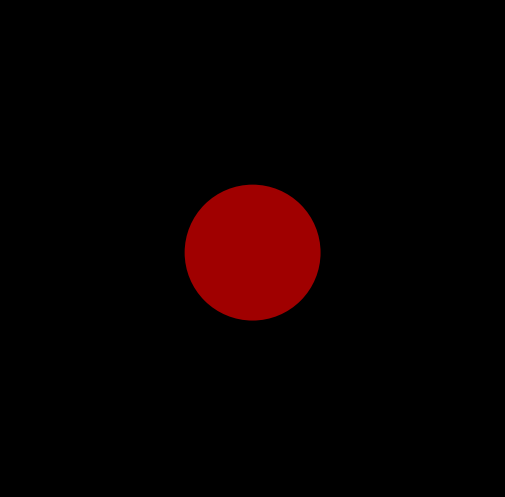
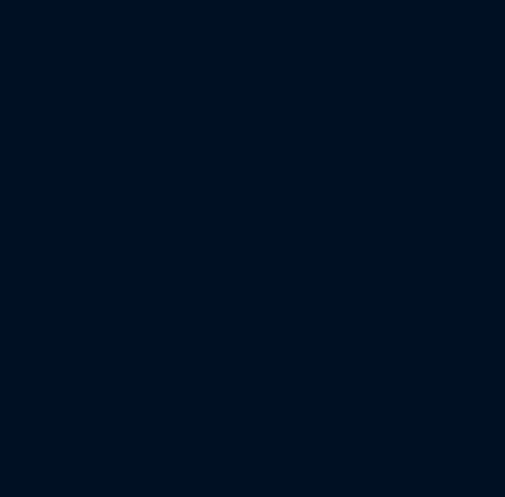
part: (252, 252) -> none

